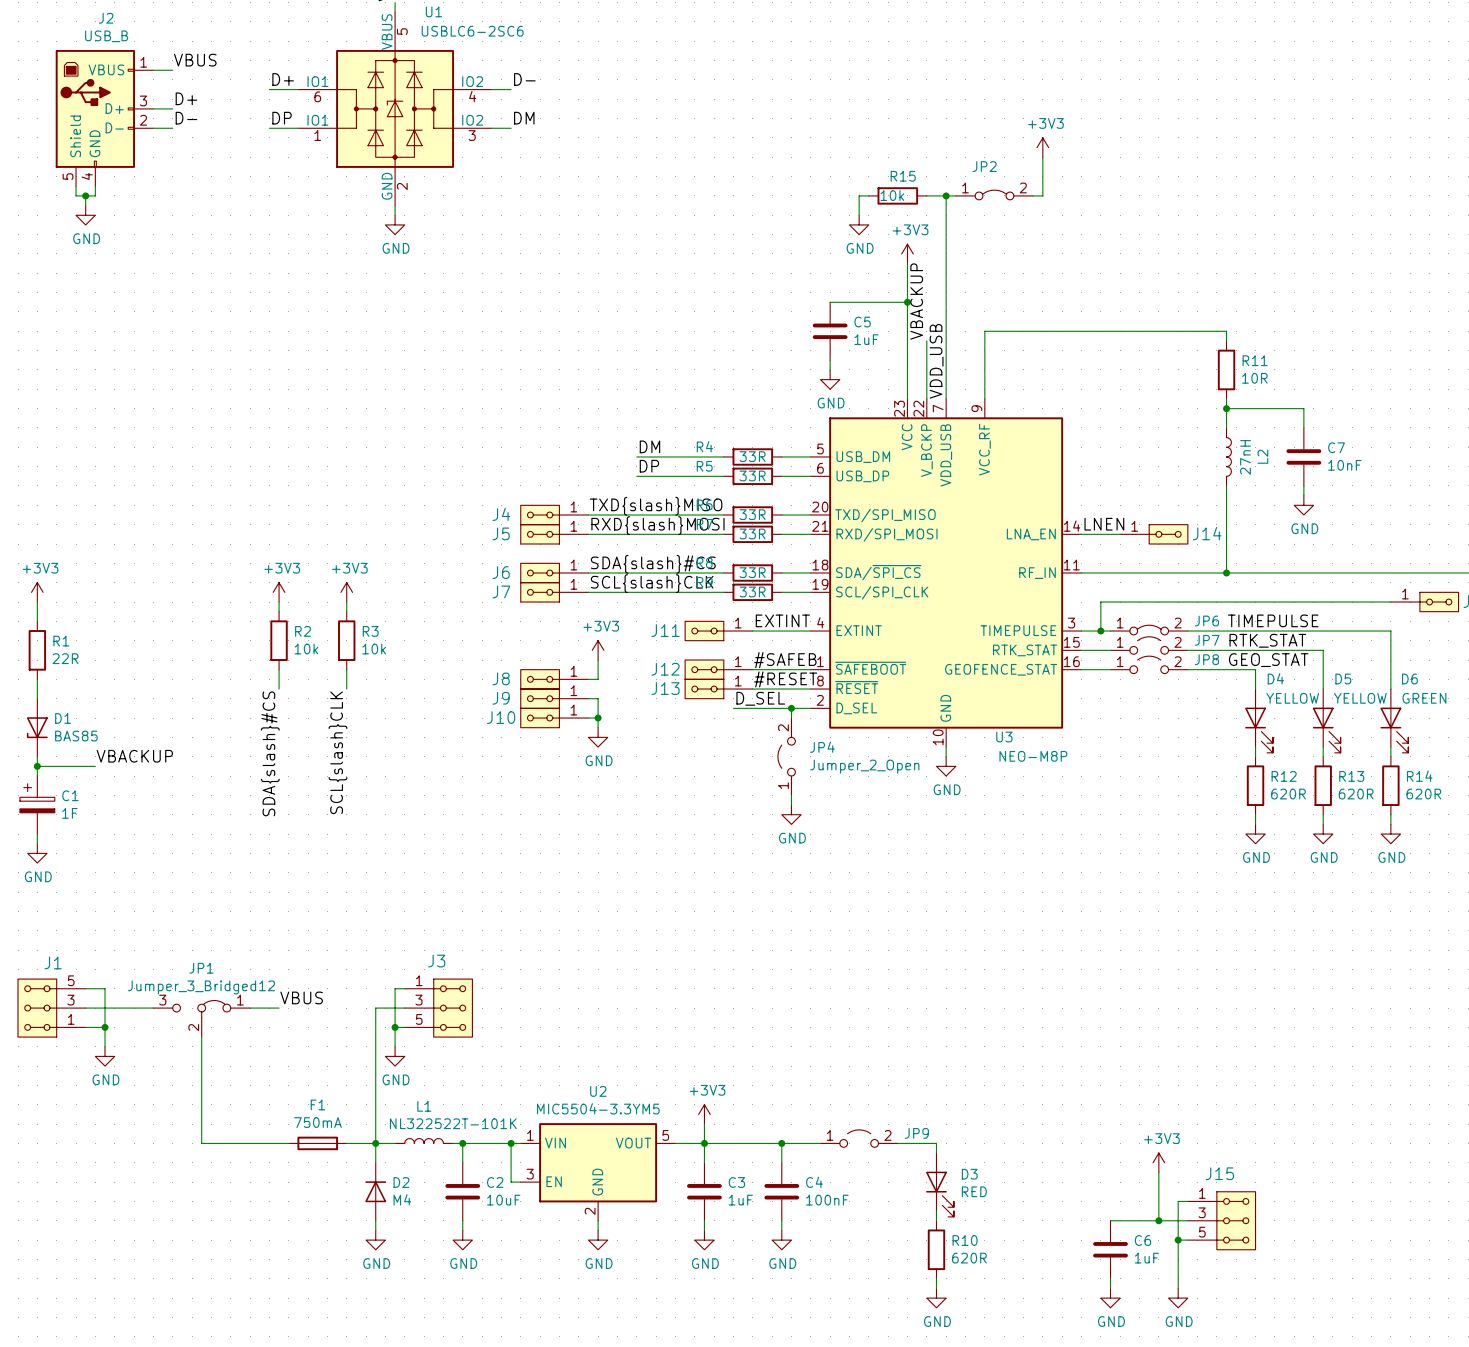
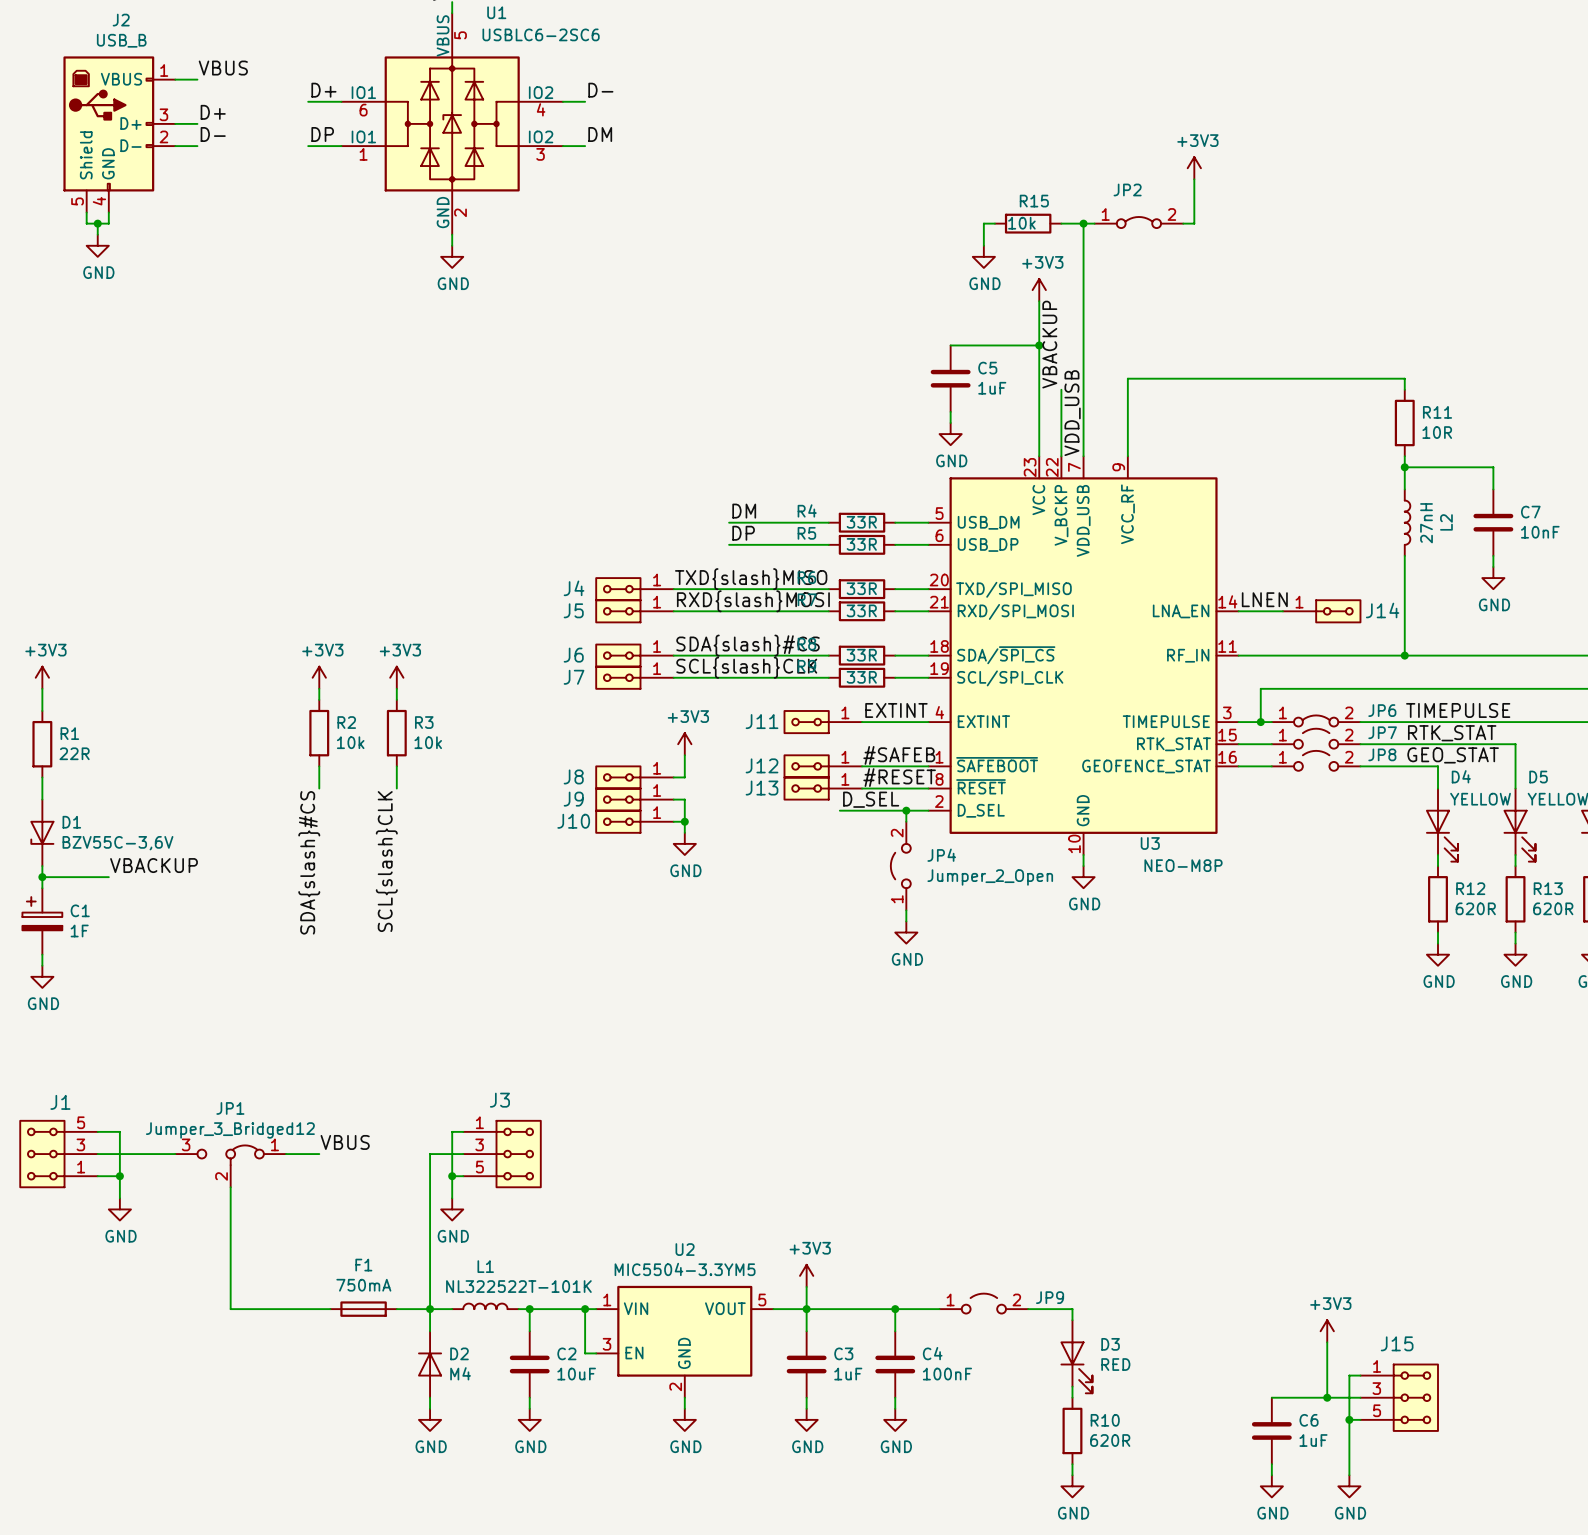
D1 value: BAS85 (76, 736) -> BZV55C-3,6V (117, 843)

